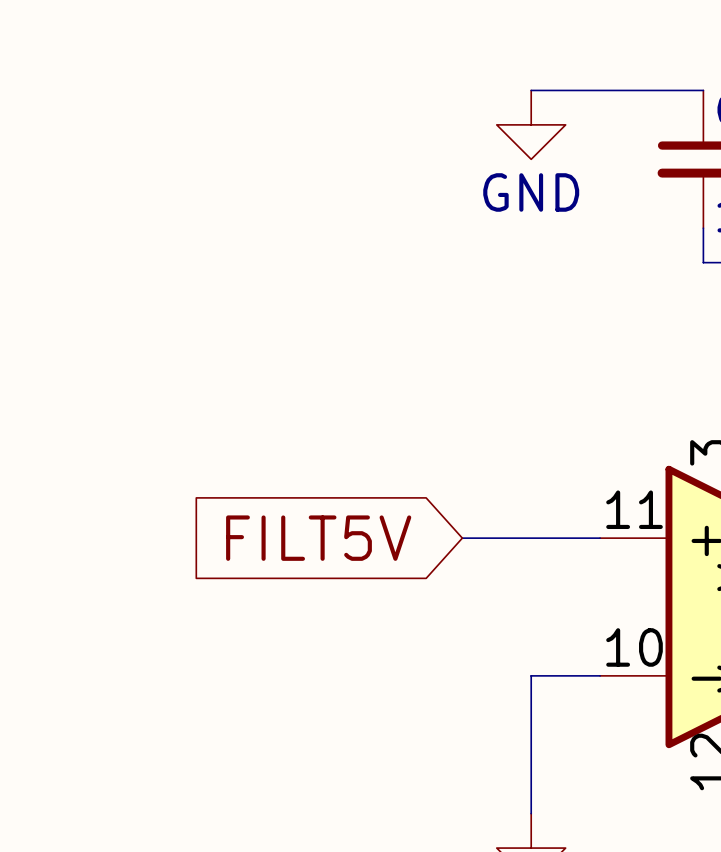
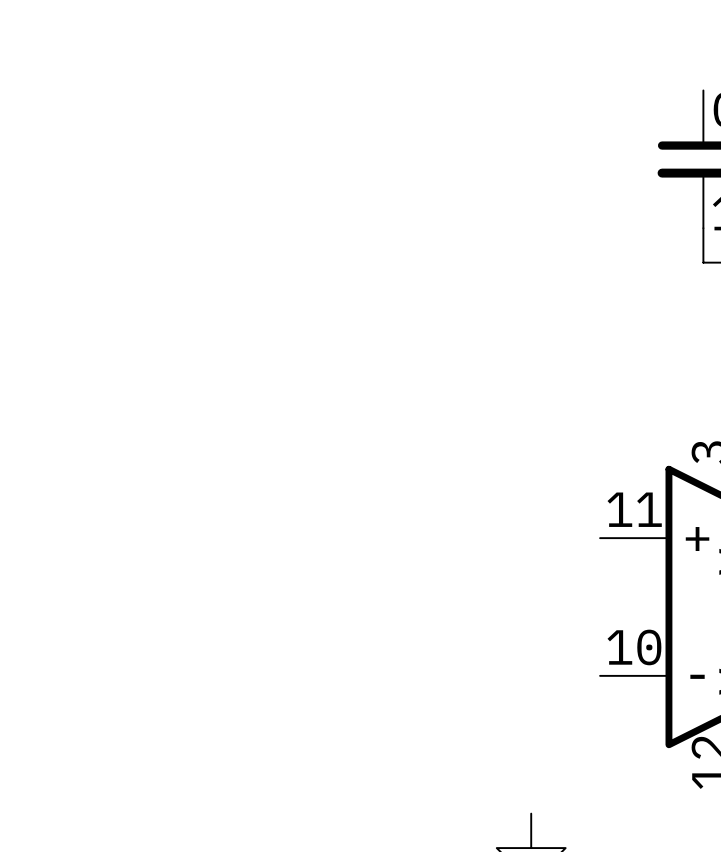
wire: (531, 90) (703, 90) -> none
power symbol: GND (531, 124) -> none
global label: FILT5V (318, 538) -> none
wire: (462, 538) (600, 538) -> none
wire: (600, 675) (531, 675) (531, 813) -> none

